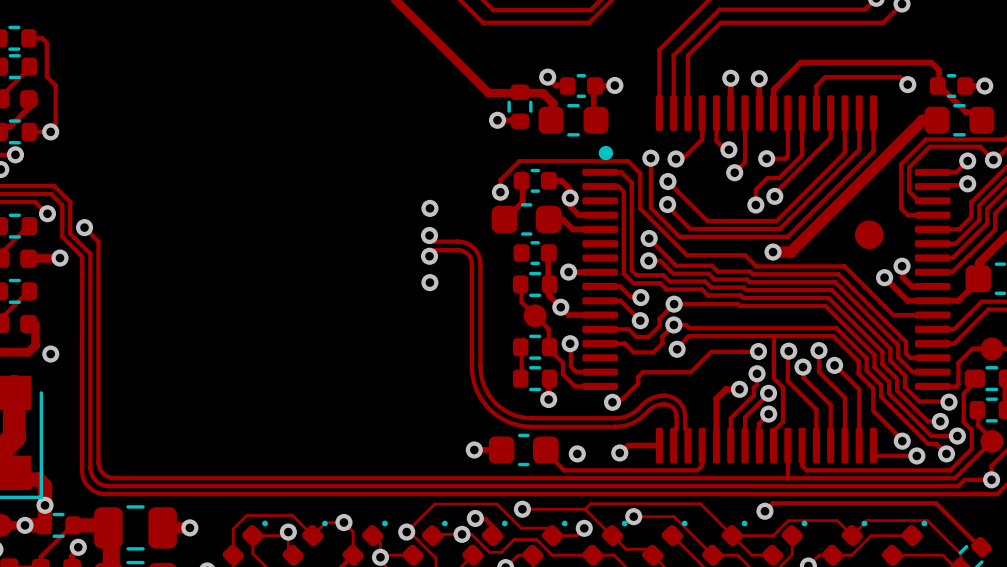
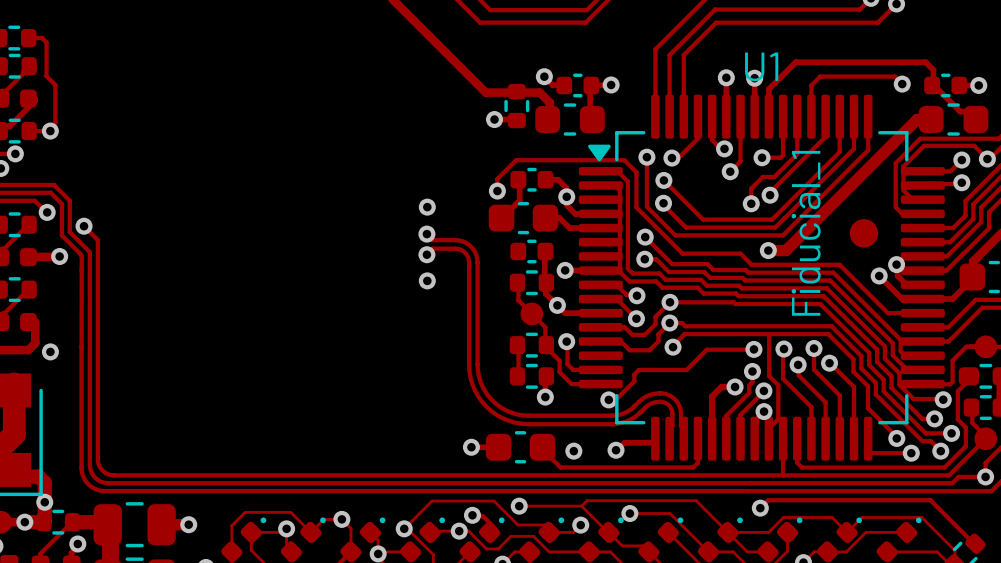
Fiducial_1 name: none -> Fiducial_1 (806, 233)
part: (766, 279) -> none
U1: none -> (761, 277)

